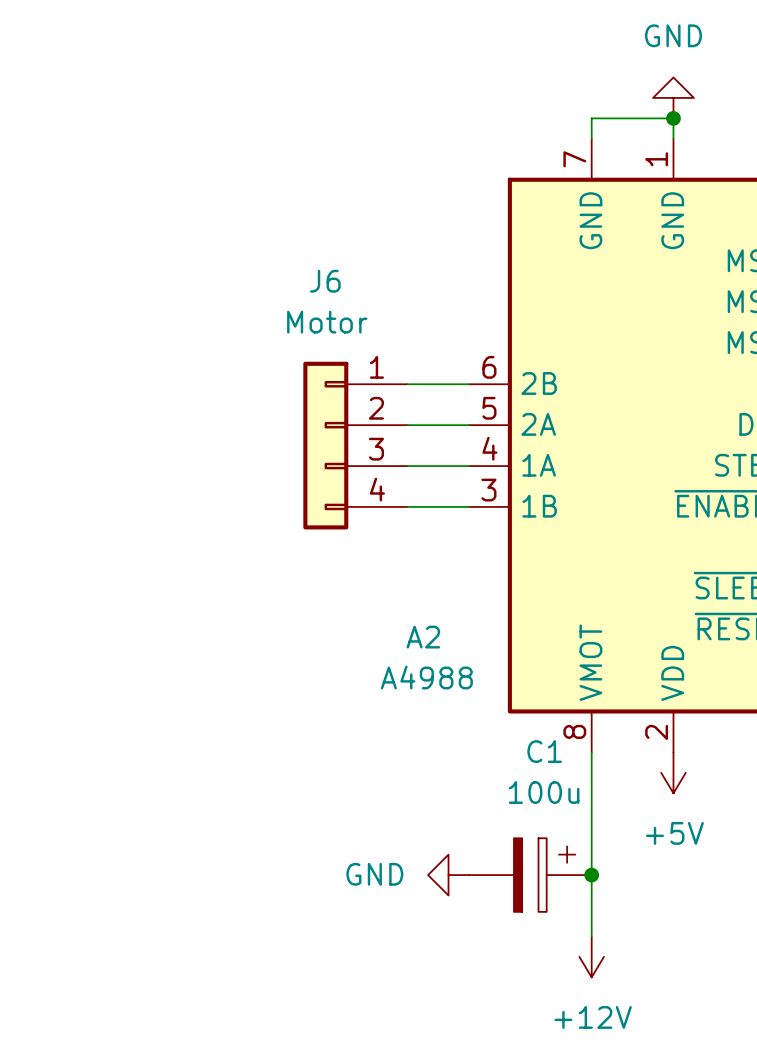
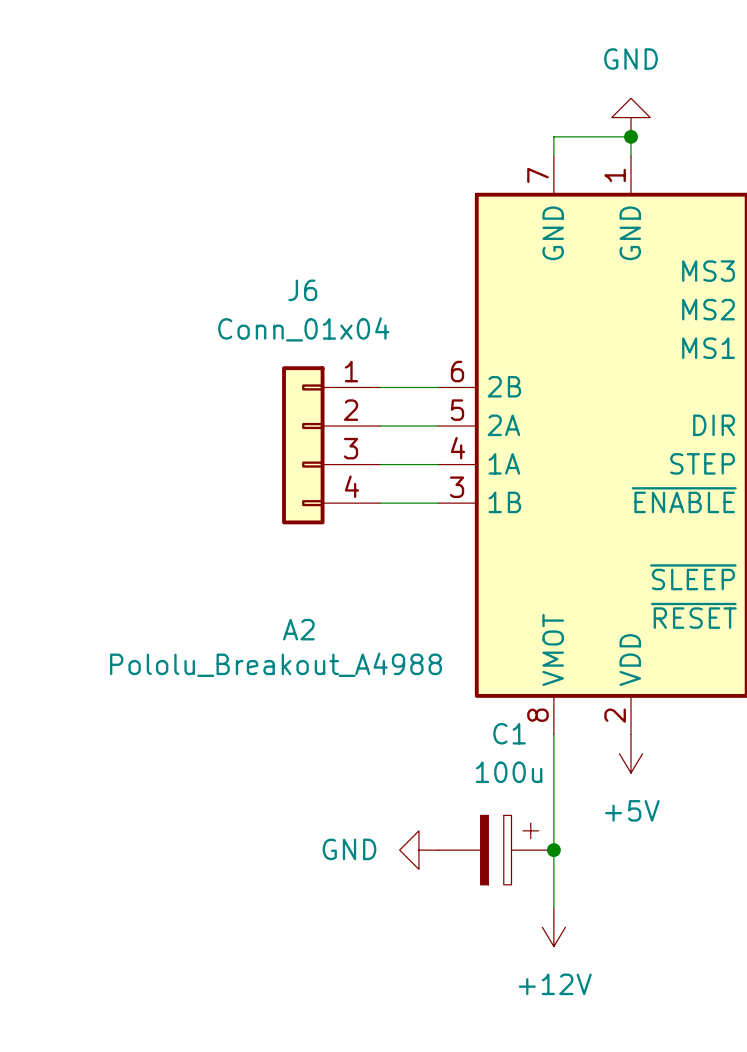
J6 value: Motor (327, 322) -> Conn_01x04 (303, 329)
A2 name position: A2 (423, 637) -> A2 (298, 629)
A2 value: A4988 (426, 677) -> Pololu_Breakout_A4988 (275, 664)

